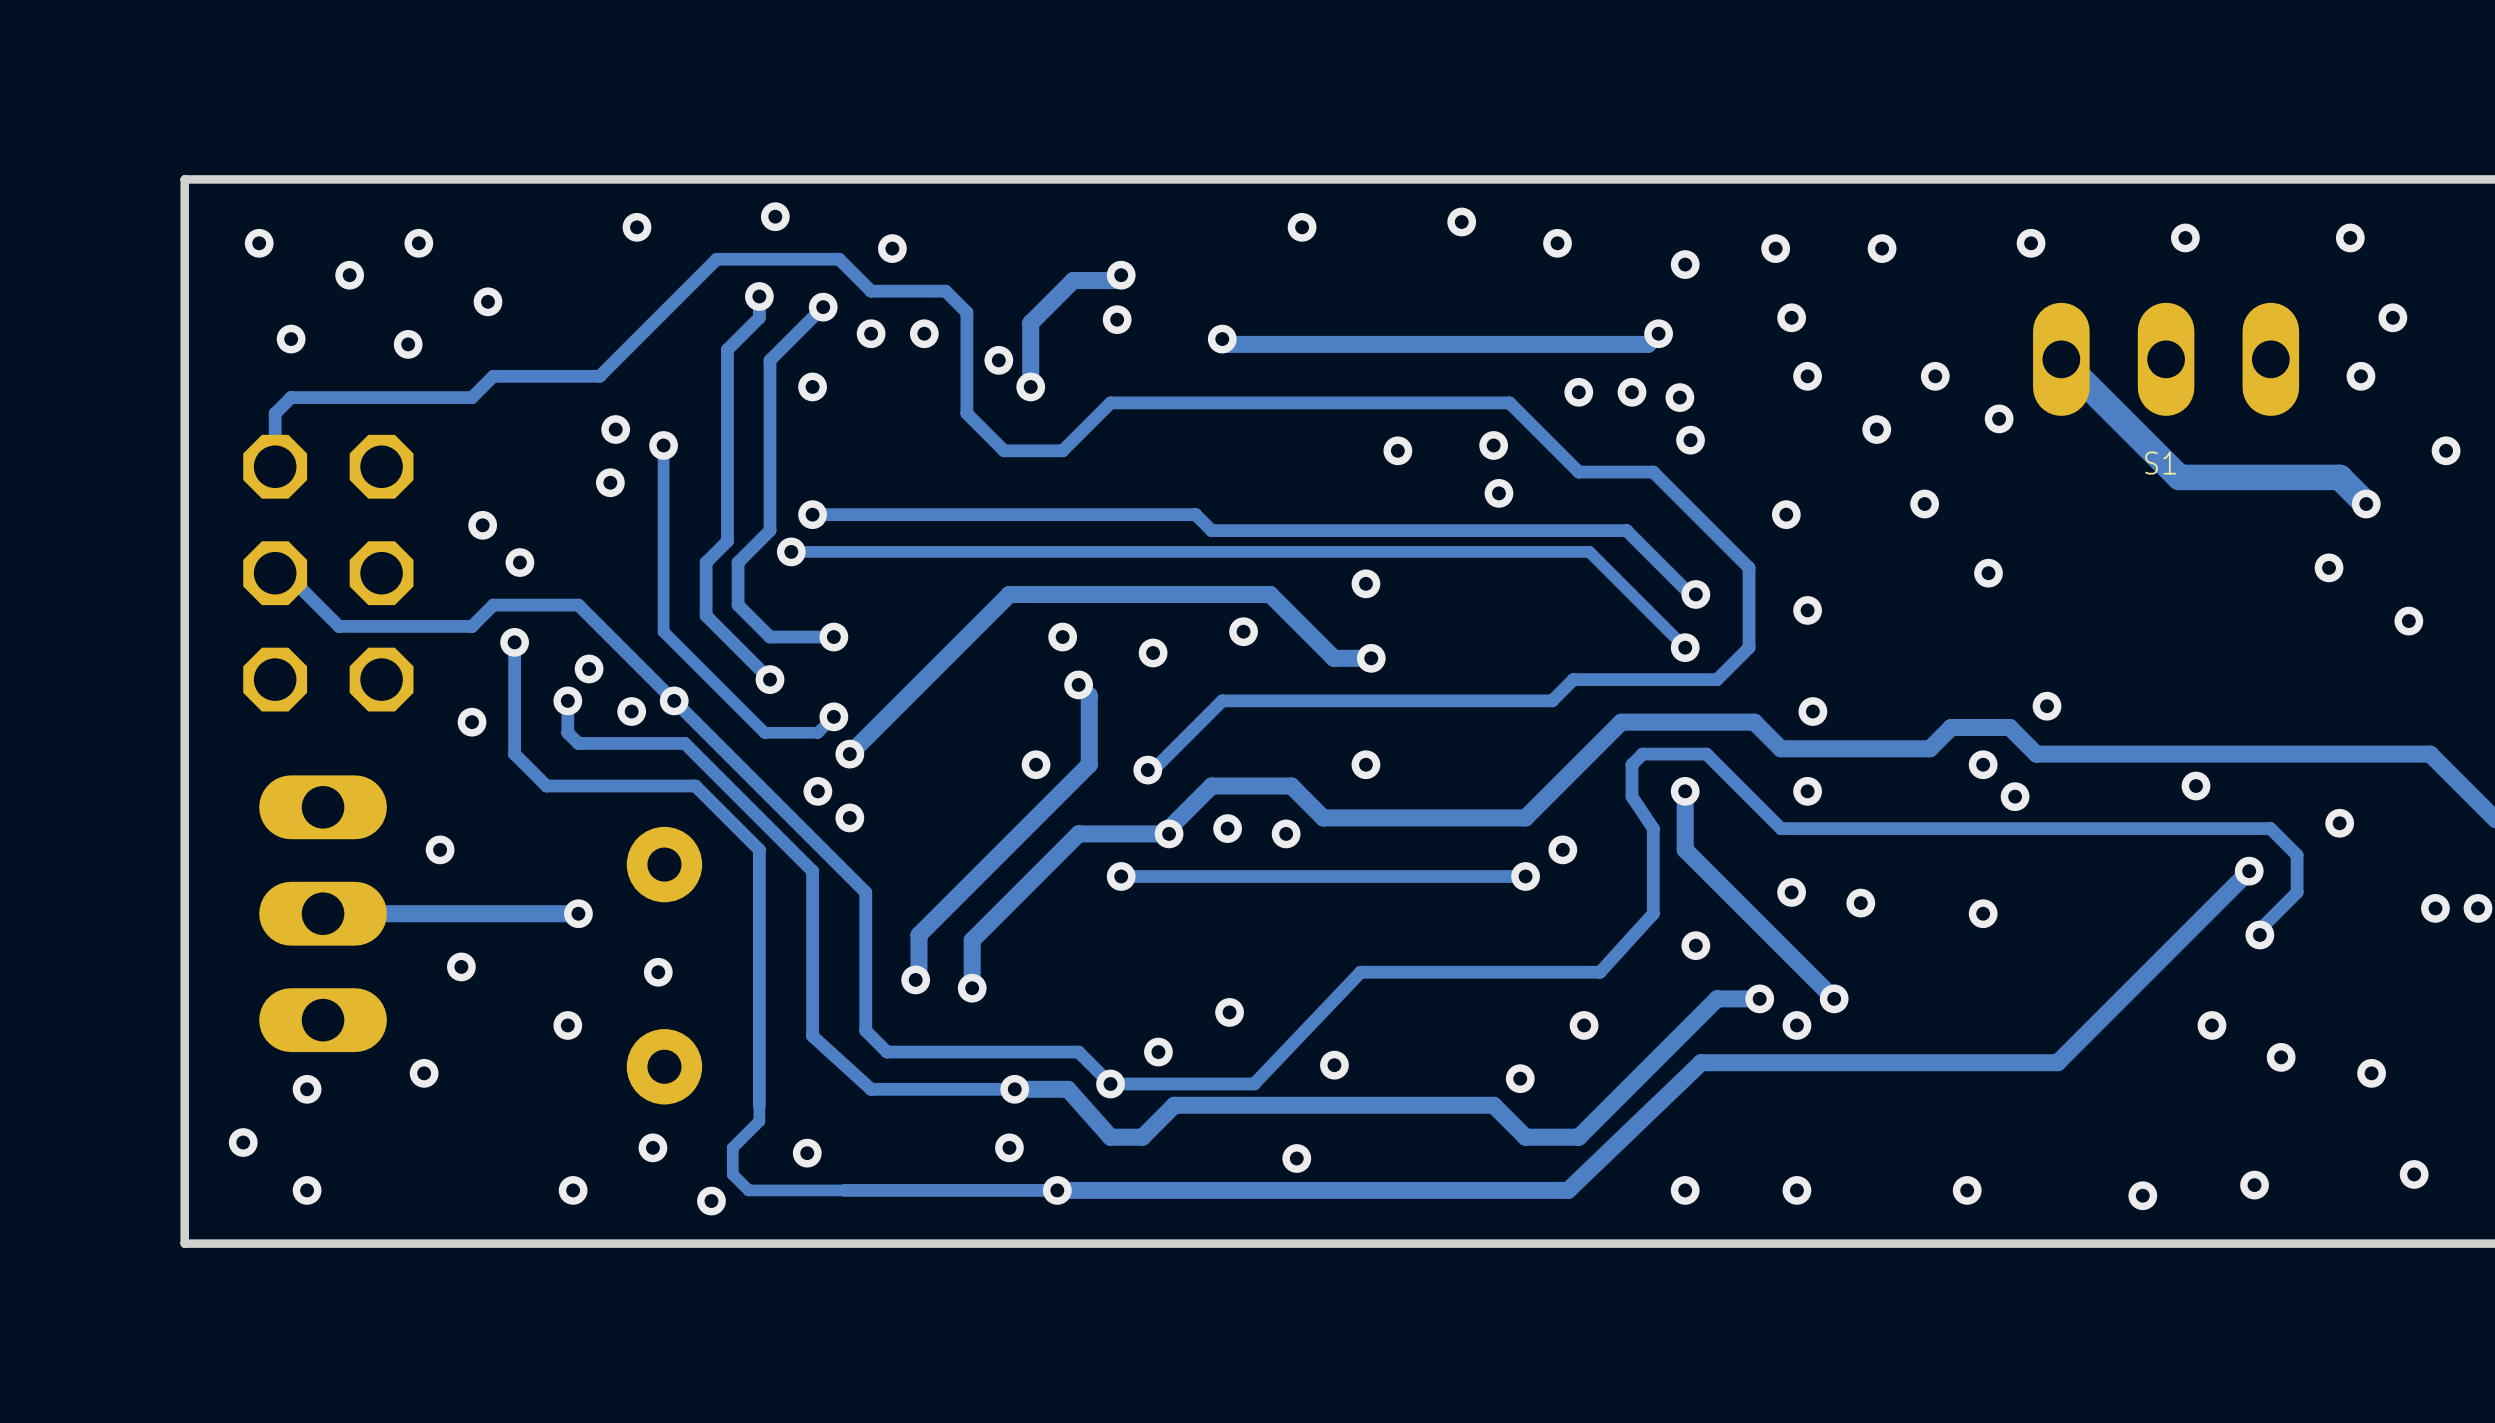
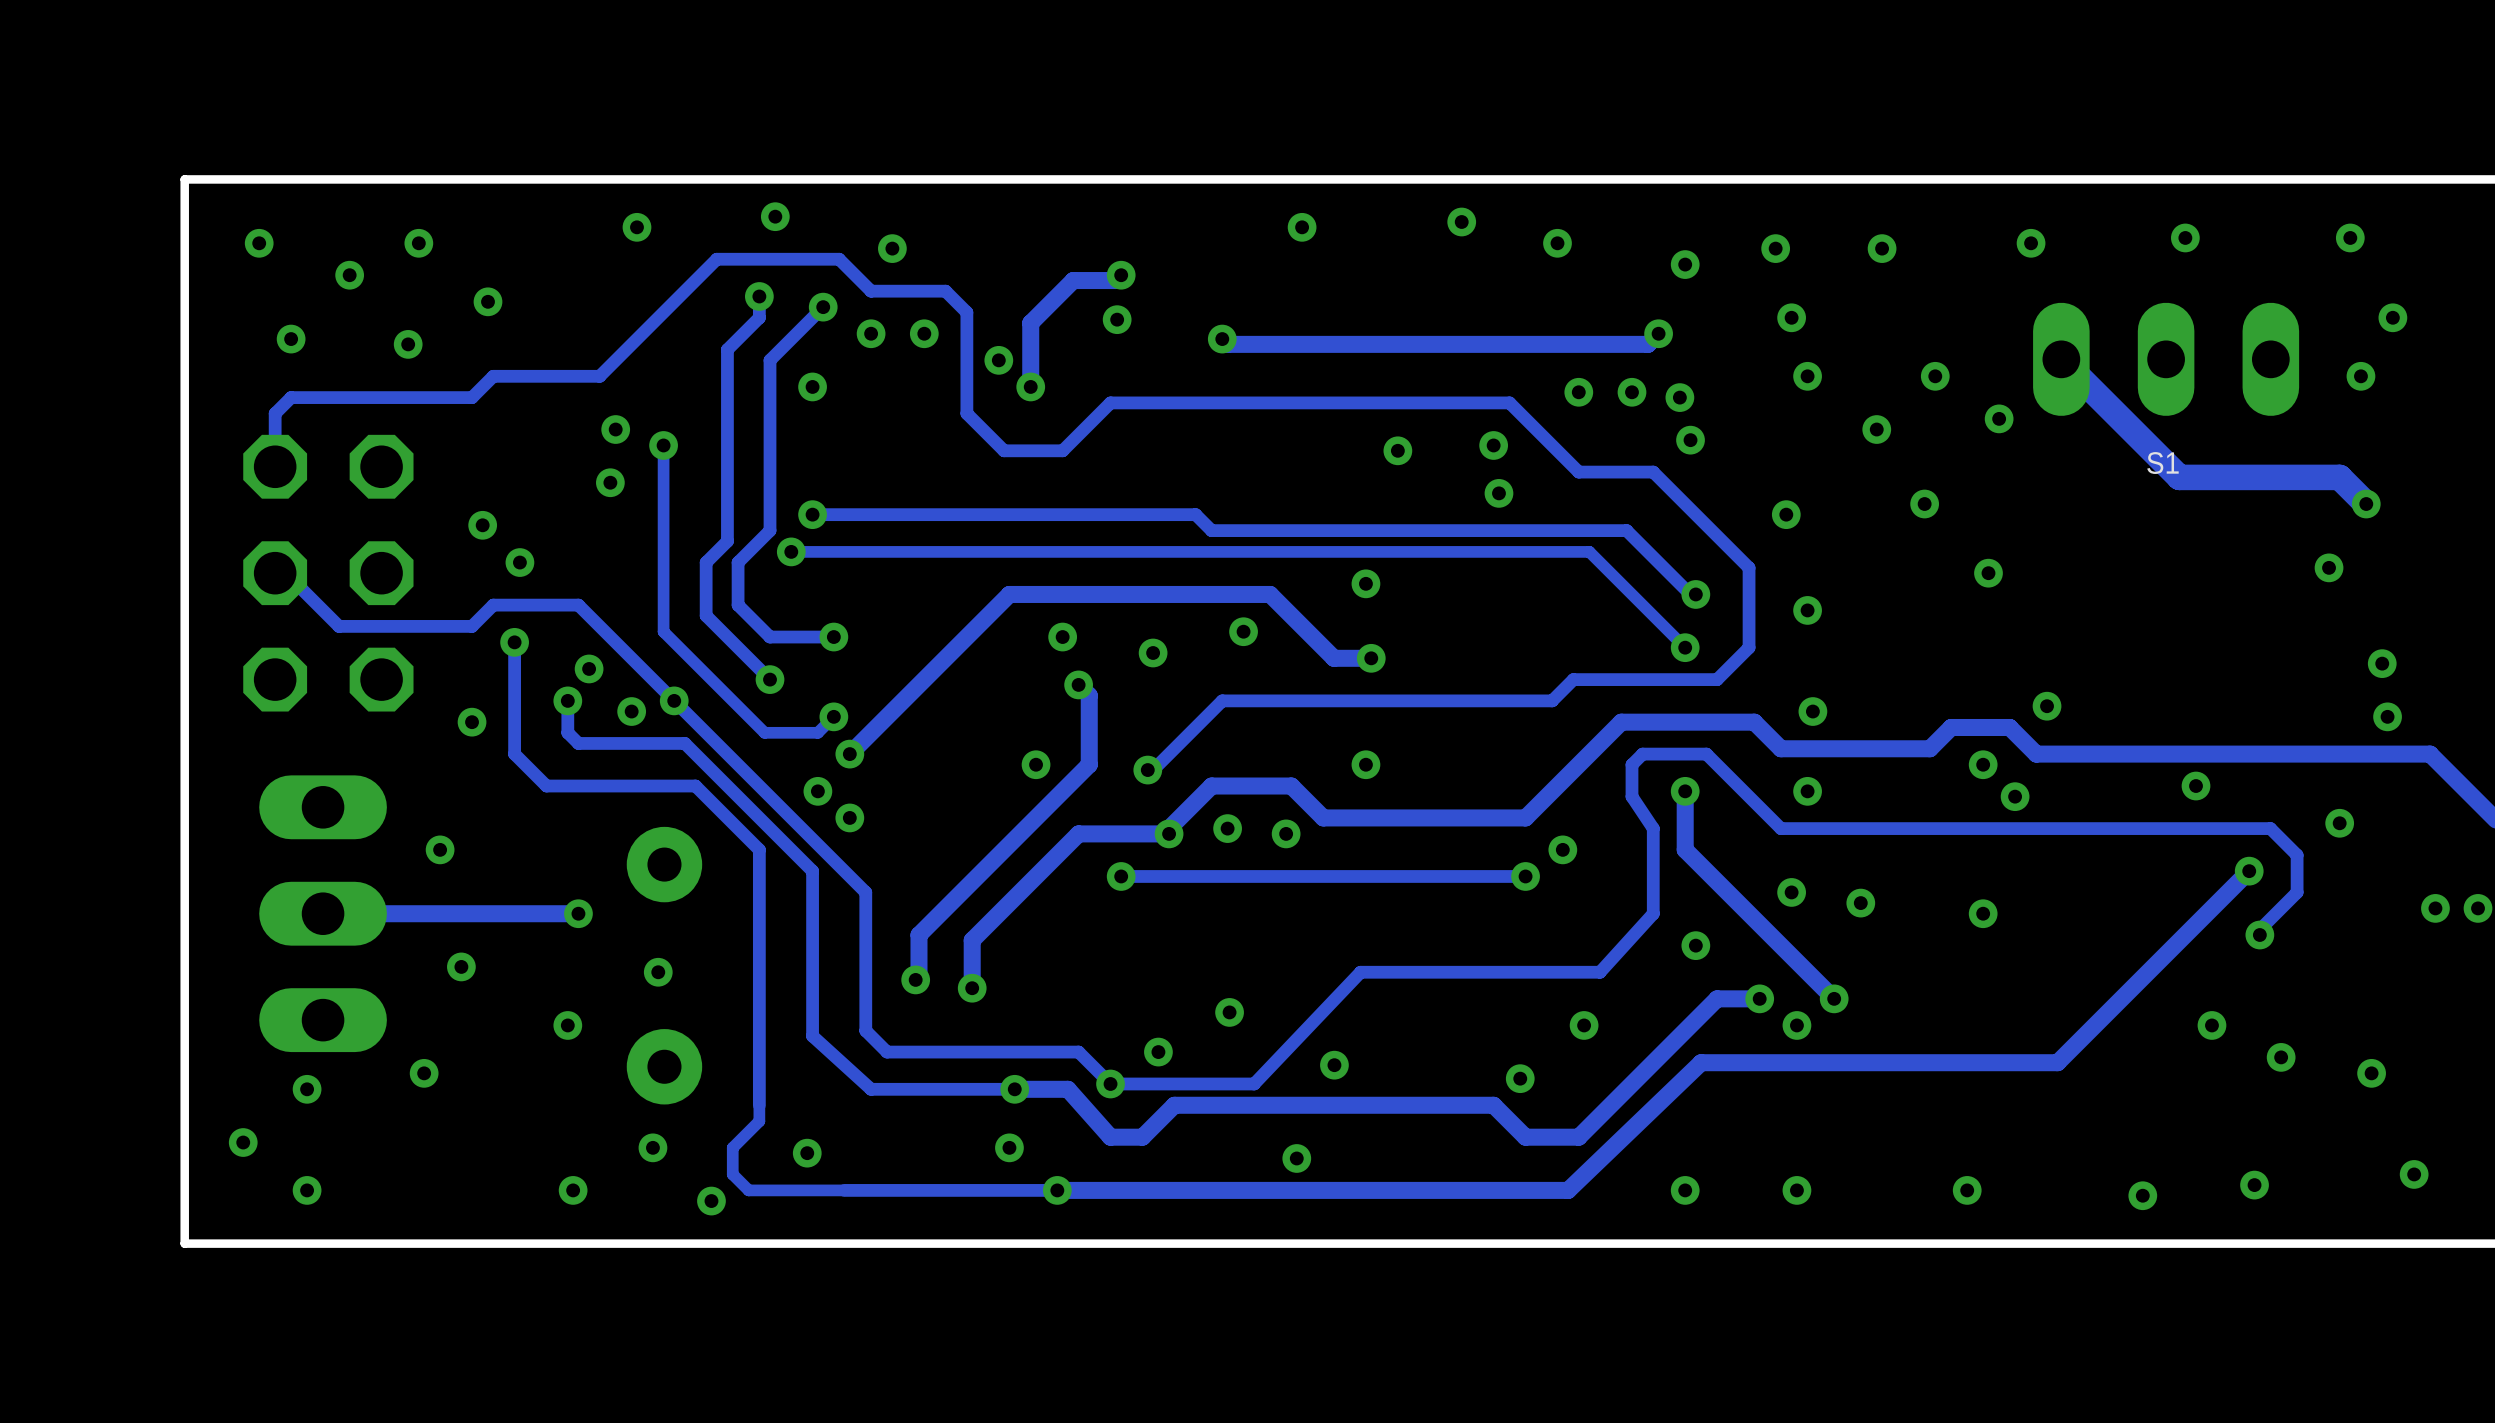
via: (2446, 450) -> none
via: (2408, 621) -> none
via: none -> (2382, 663)
via: none -> (2387, 716)

